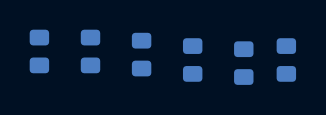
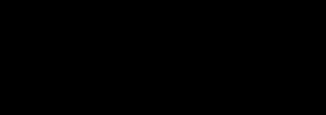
part: (39, 51) -> none
part: (90, 51) -> none
part: (141, 54) -> none
part: (192, 59) -> none
part: (286, 59) -> none
part: (243, 63) -> none

